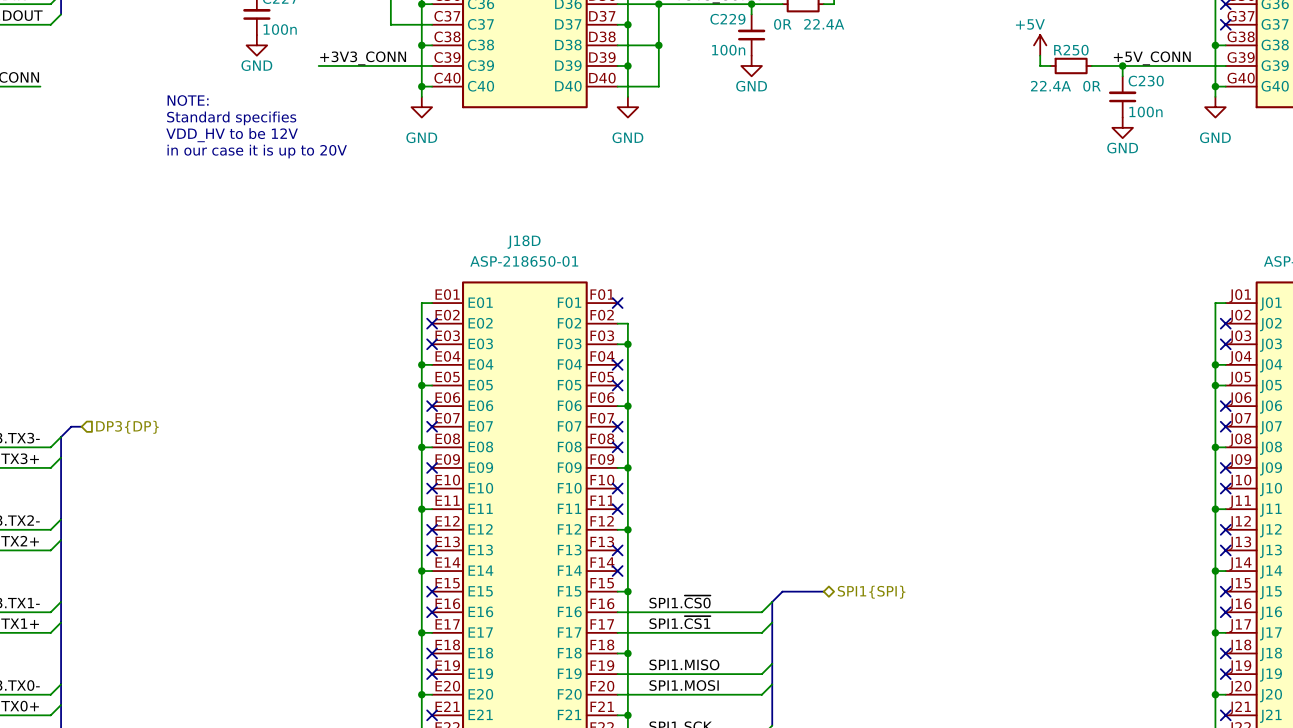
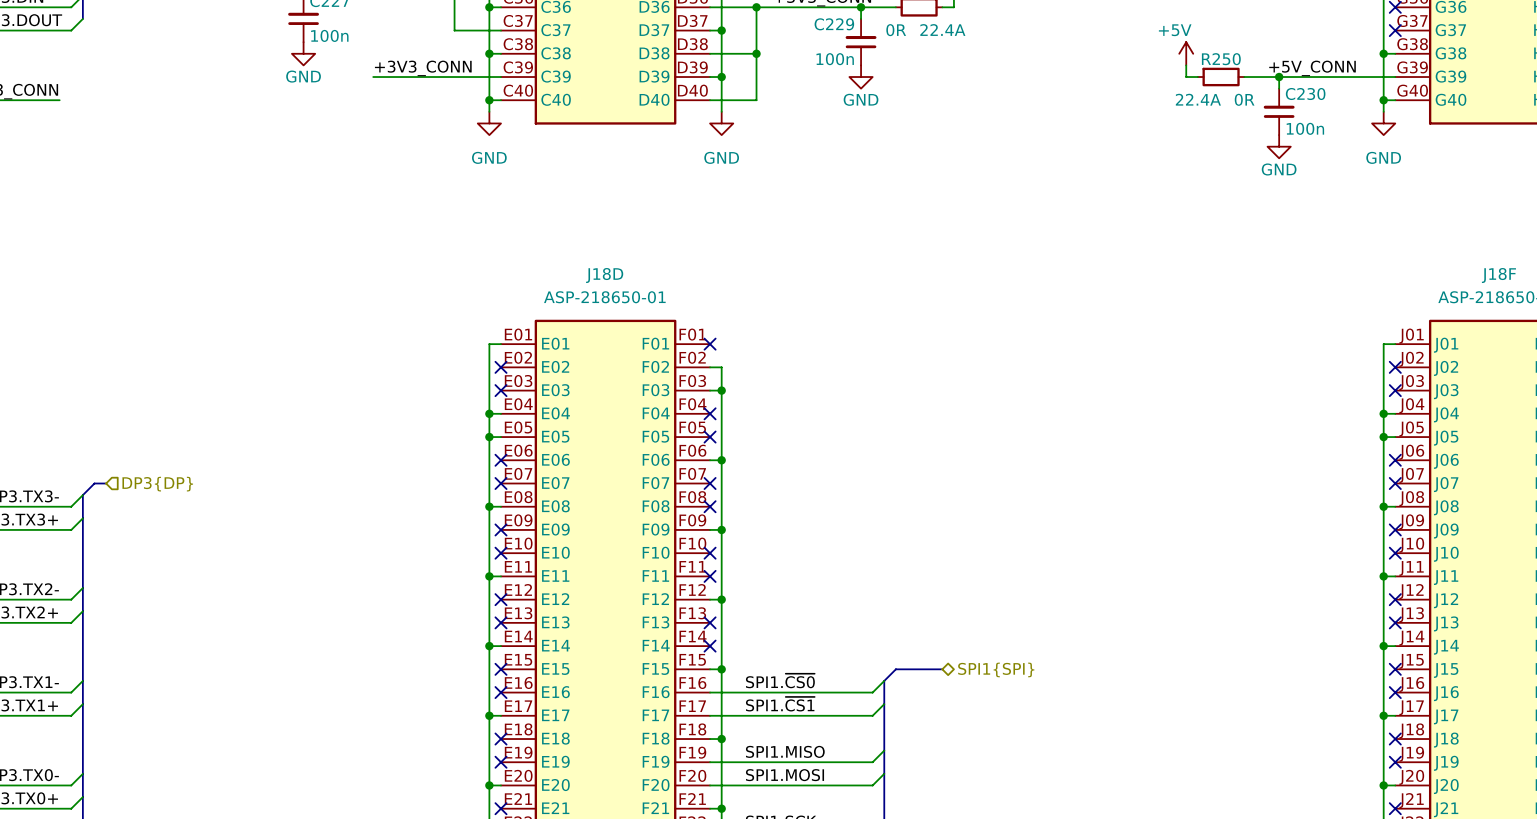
text: NOTE: (188, 100) -> none
text: Standard specifies (231, 118) -> none
text: VDD_HV to be 12V (232, 135) -> none
text: in our case it is up to 20V (257, 151) -> none

